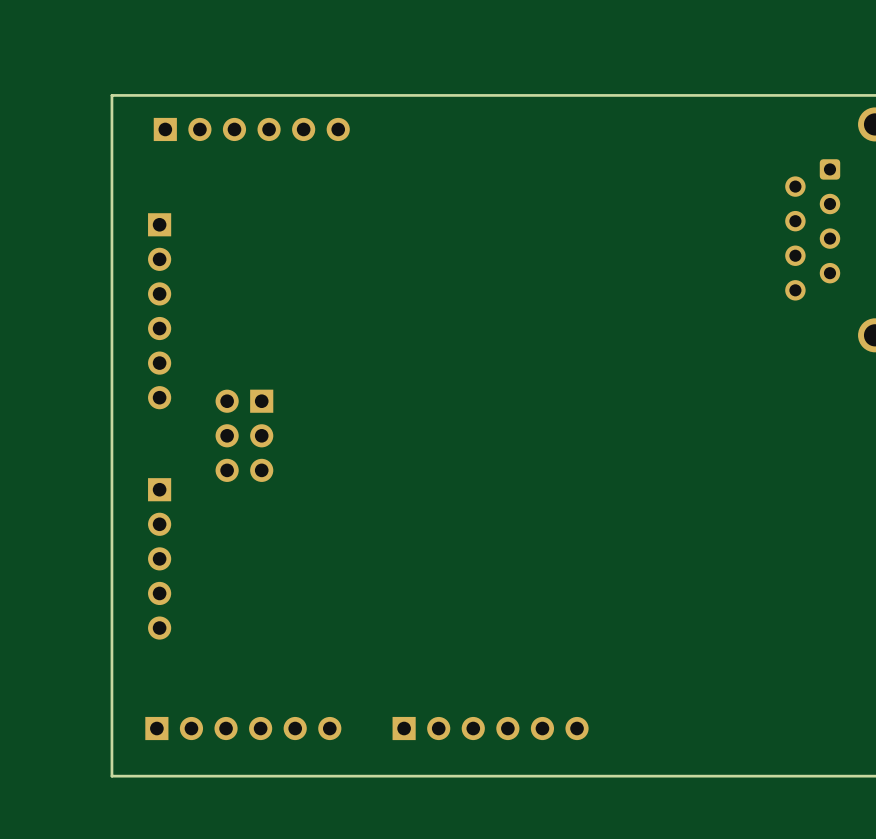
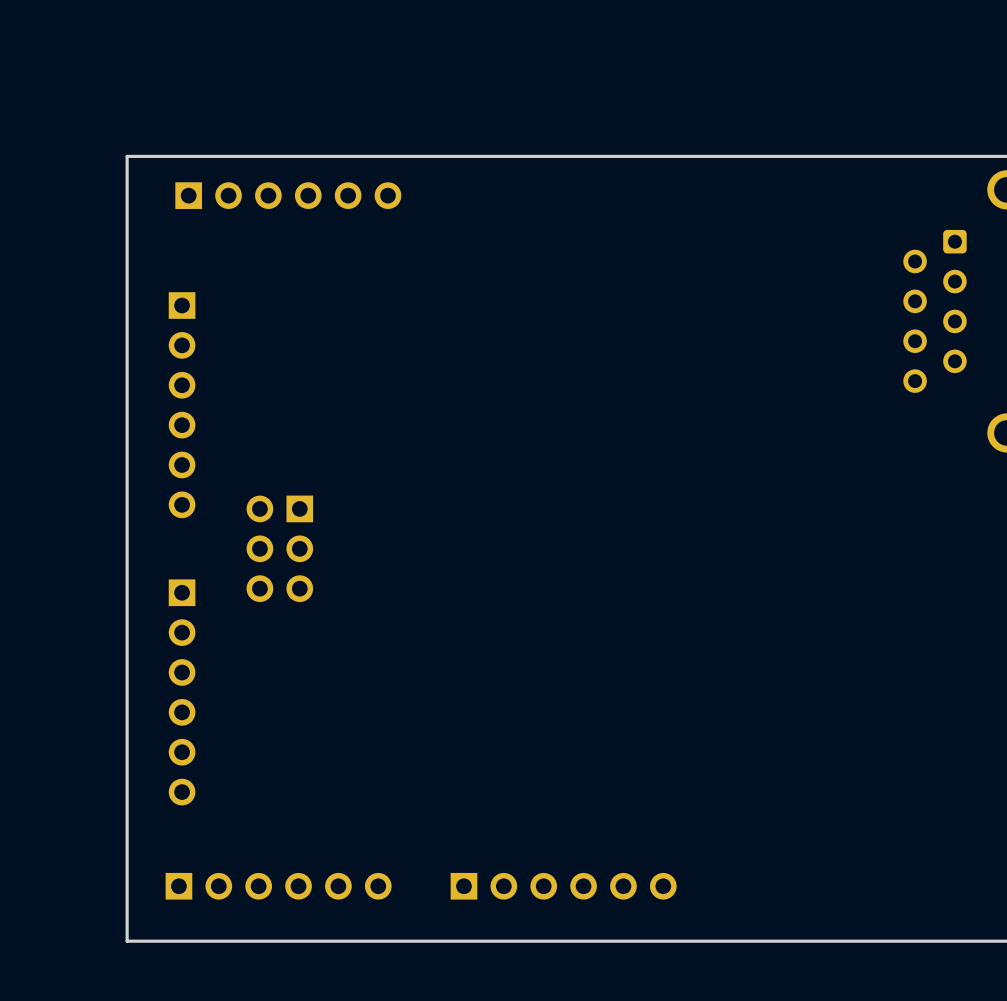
part footprint: [148, 478, 172, 640] -> [168, 579, 196, 806]

